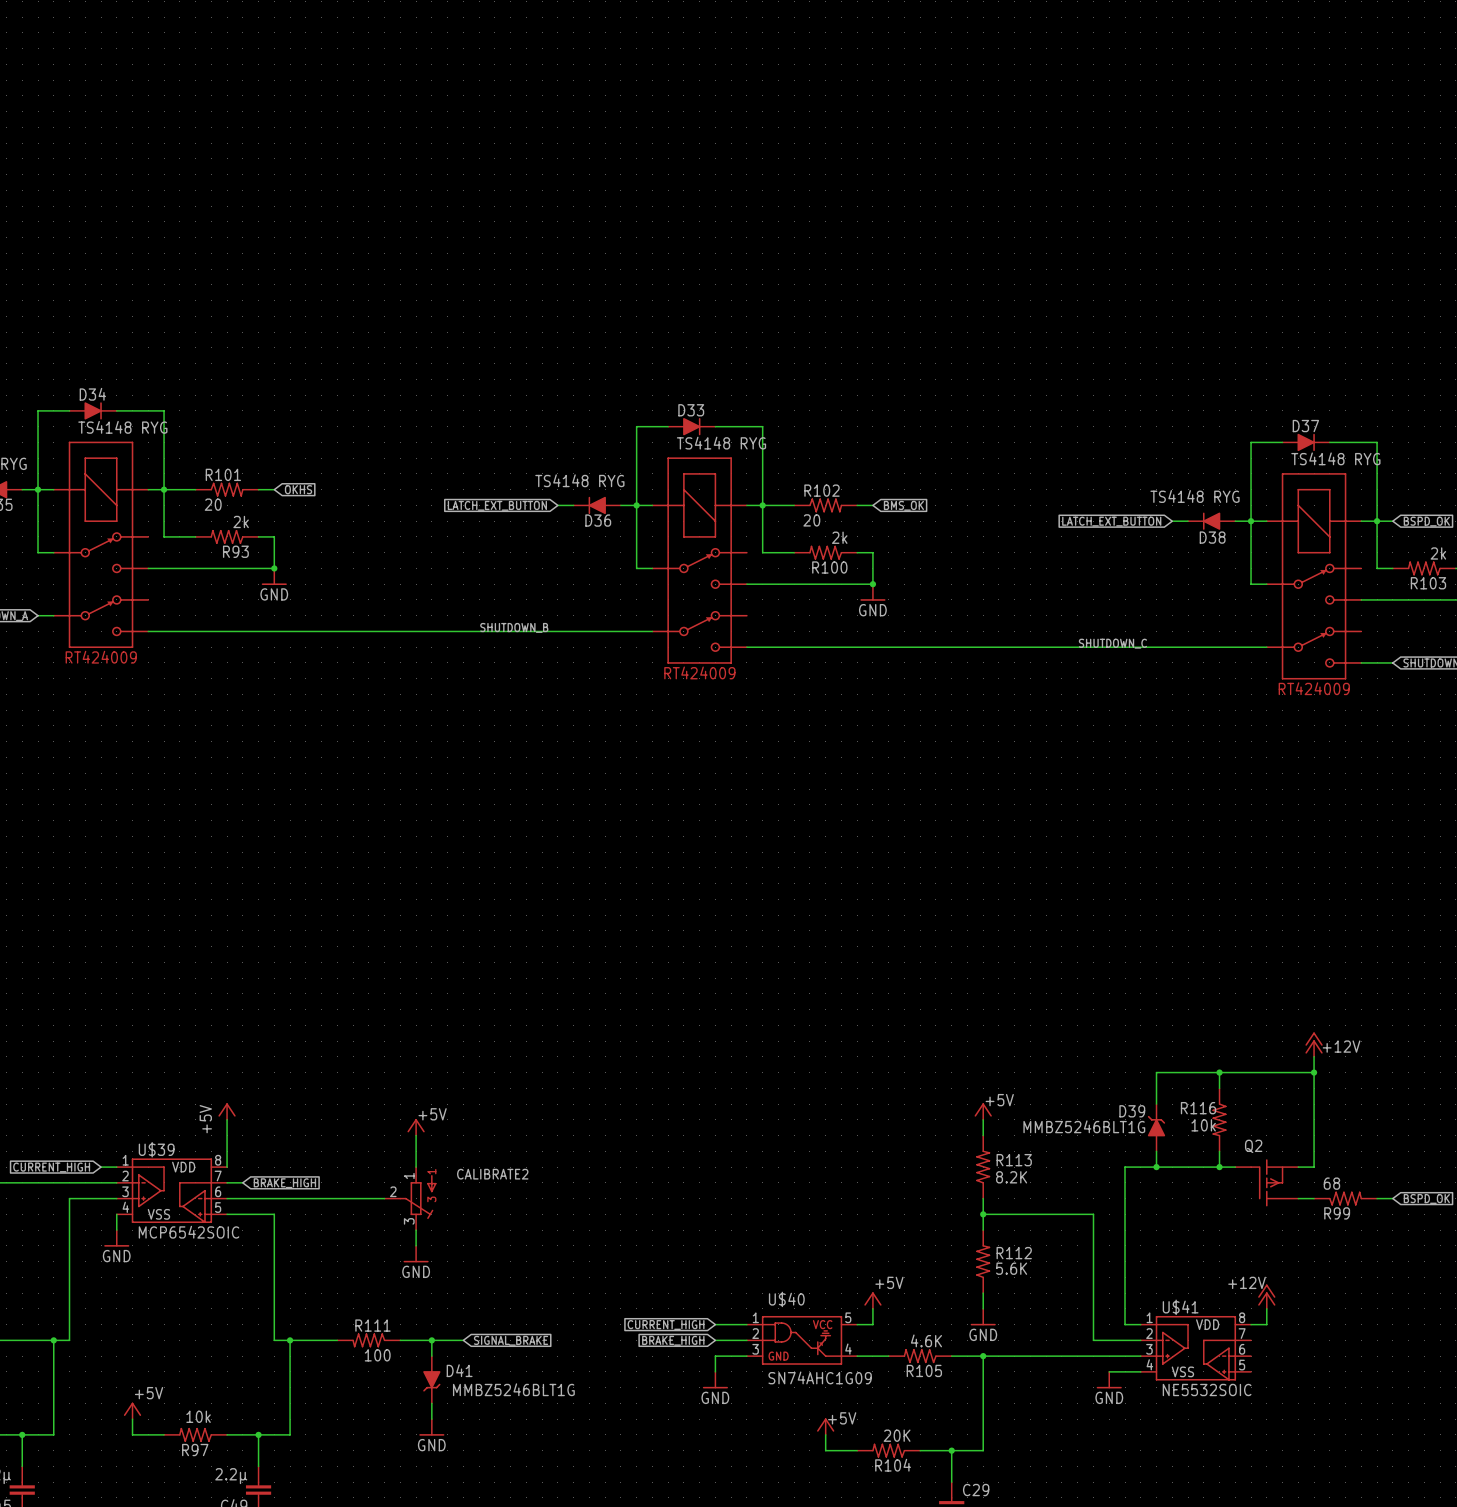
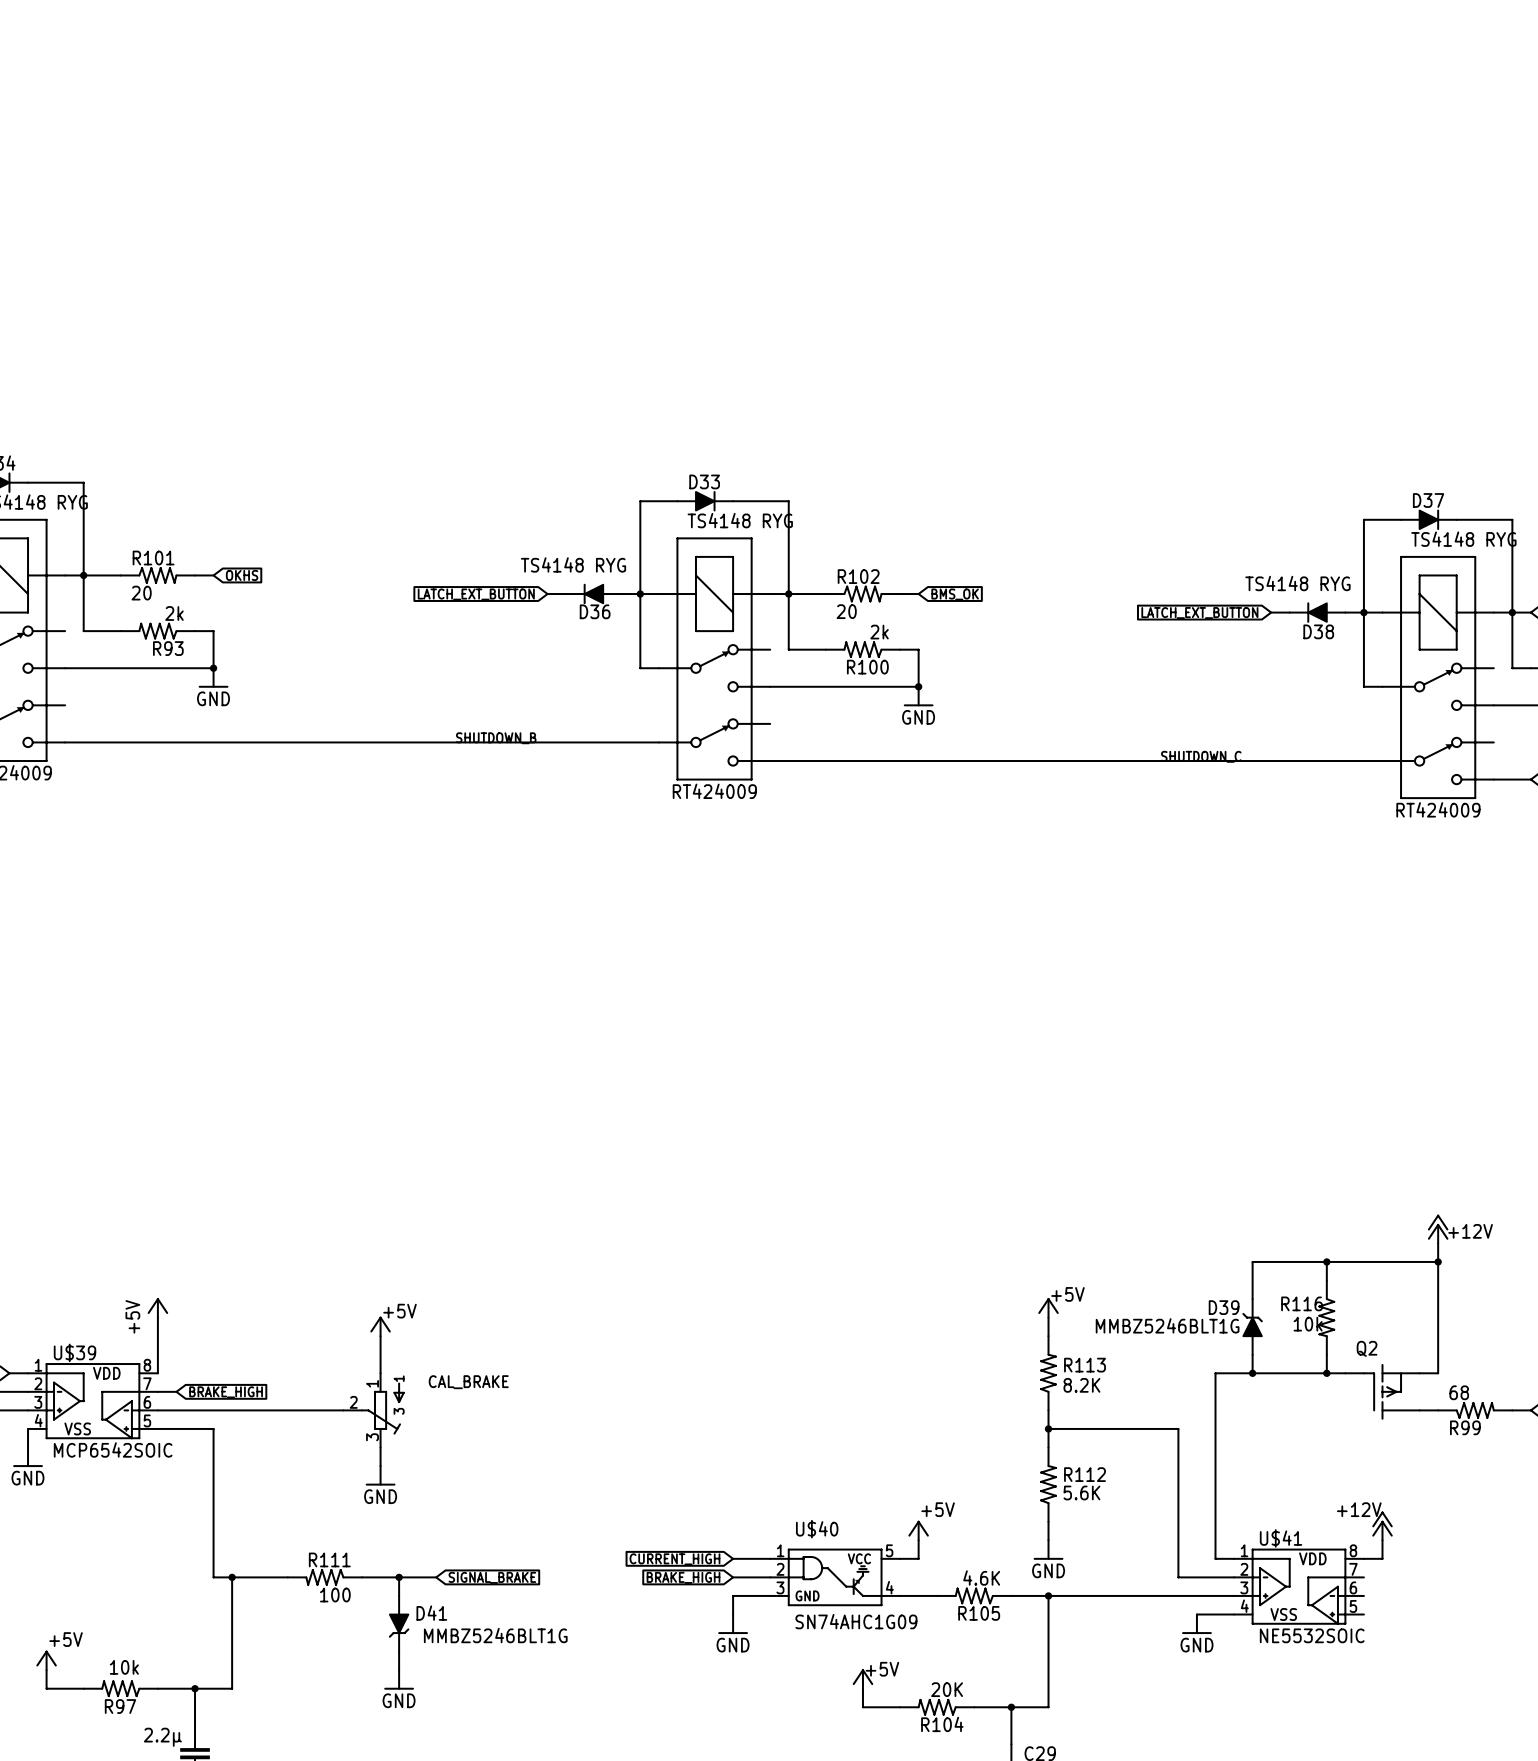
CALIBRATE2 name: CALIBRATE2 (492, 1174) -> CAL_BRAKE (468, 1382)

